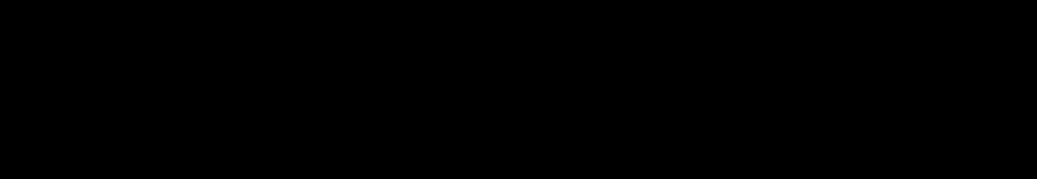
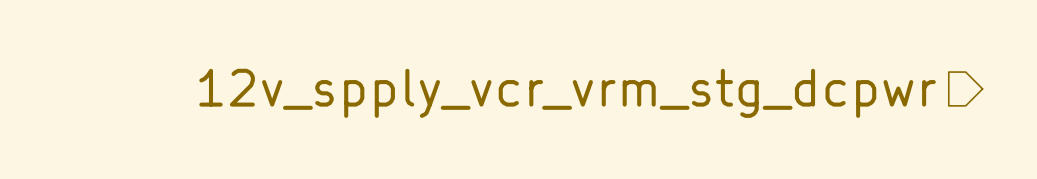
hierarchical label: none -> 12v_spply_vcr_vrm_stg_dcpwr (567, 93)

